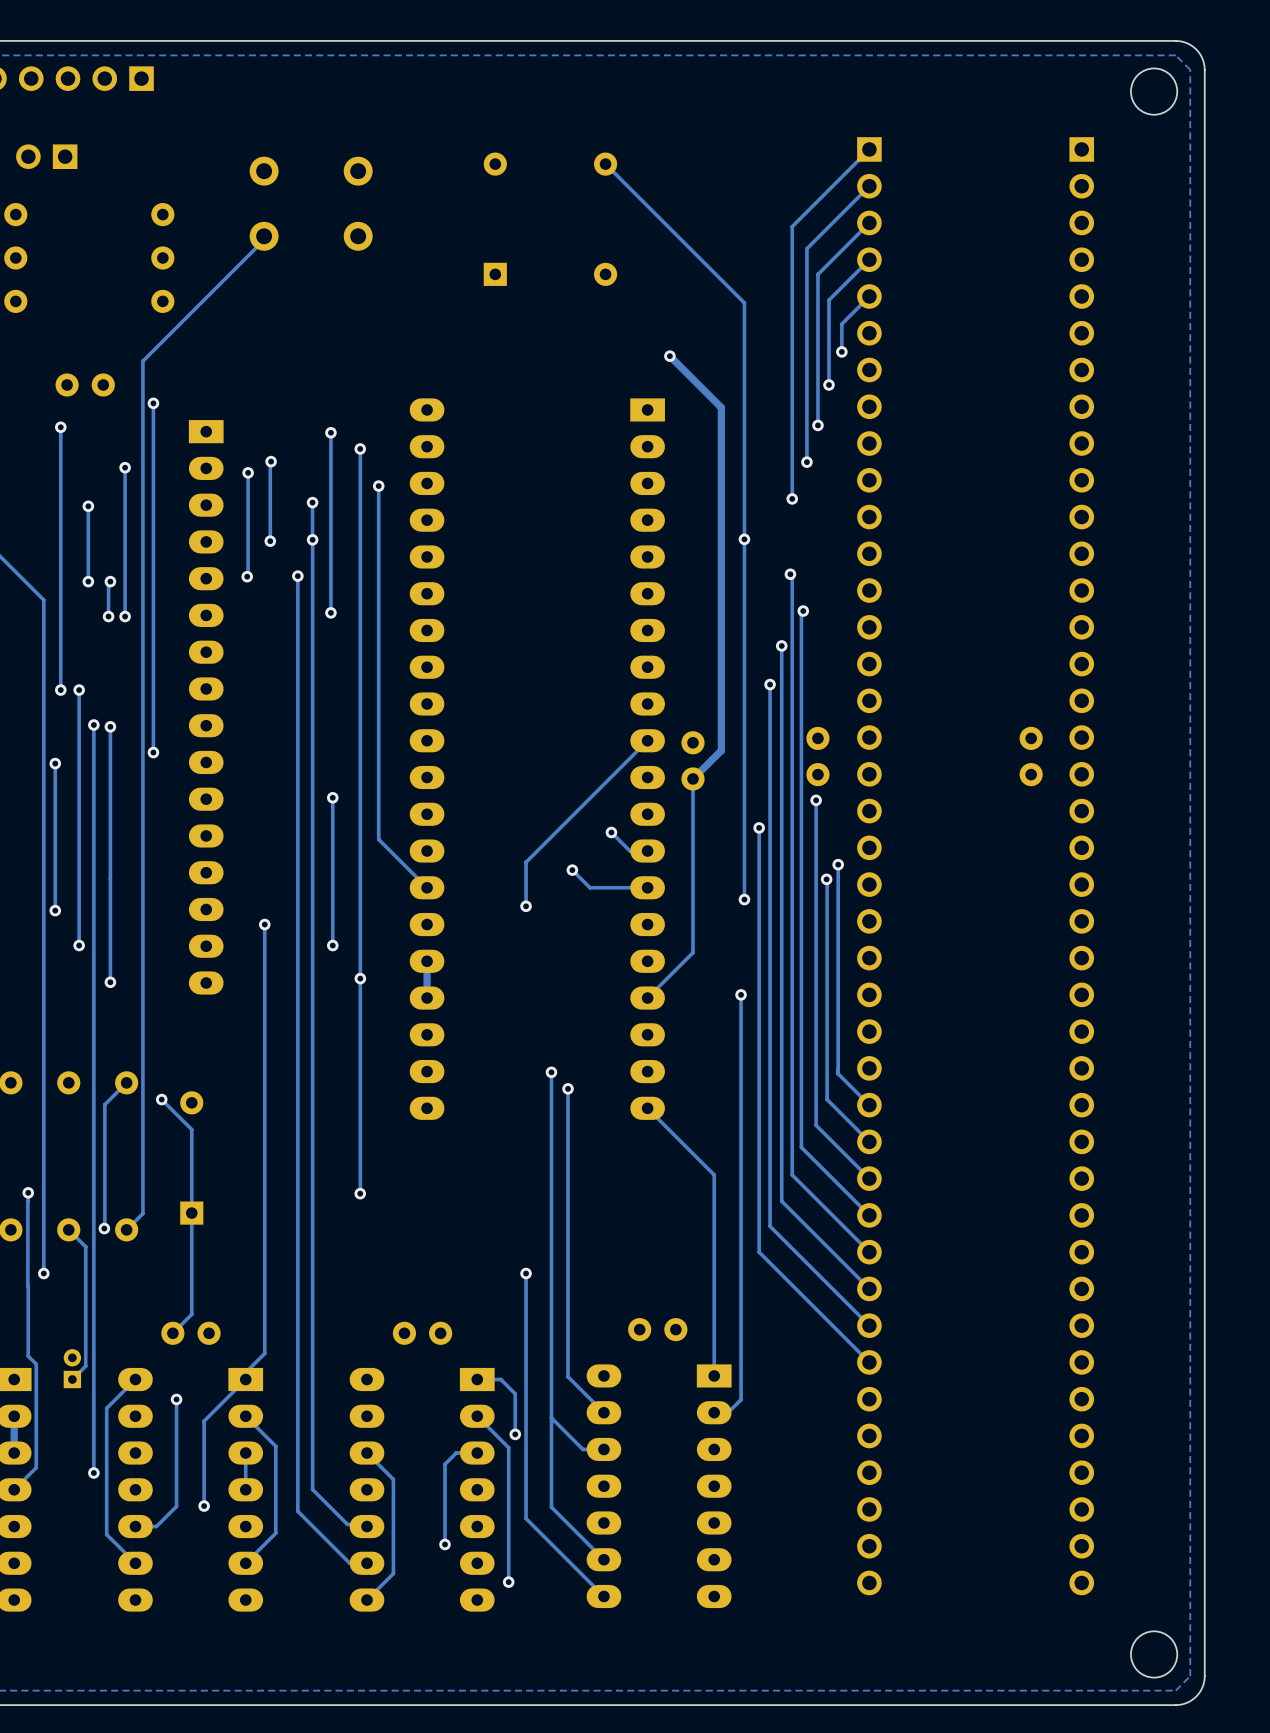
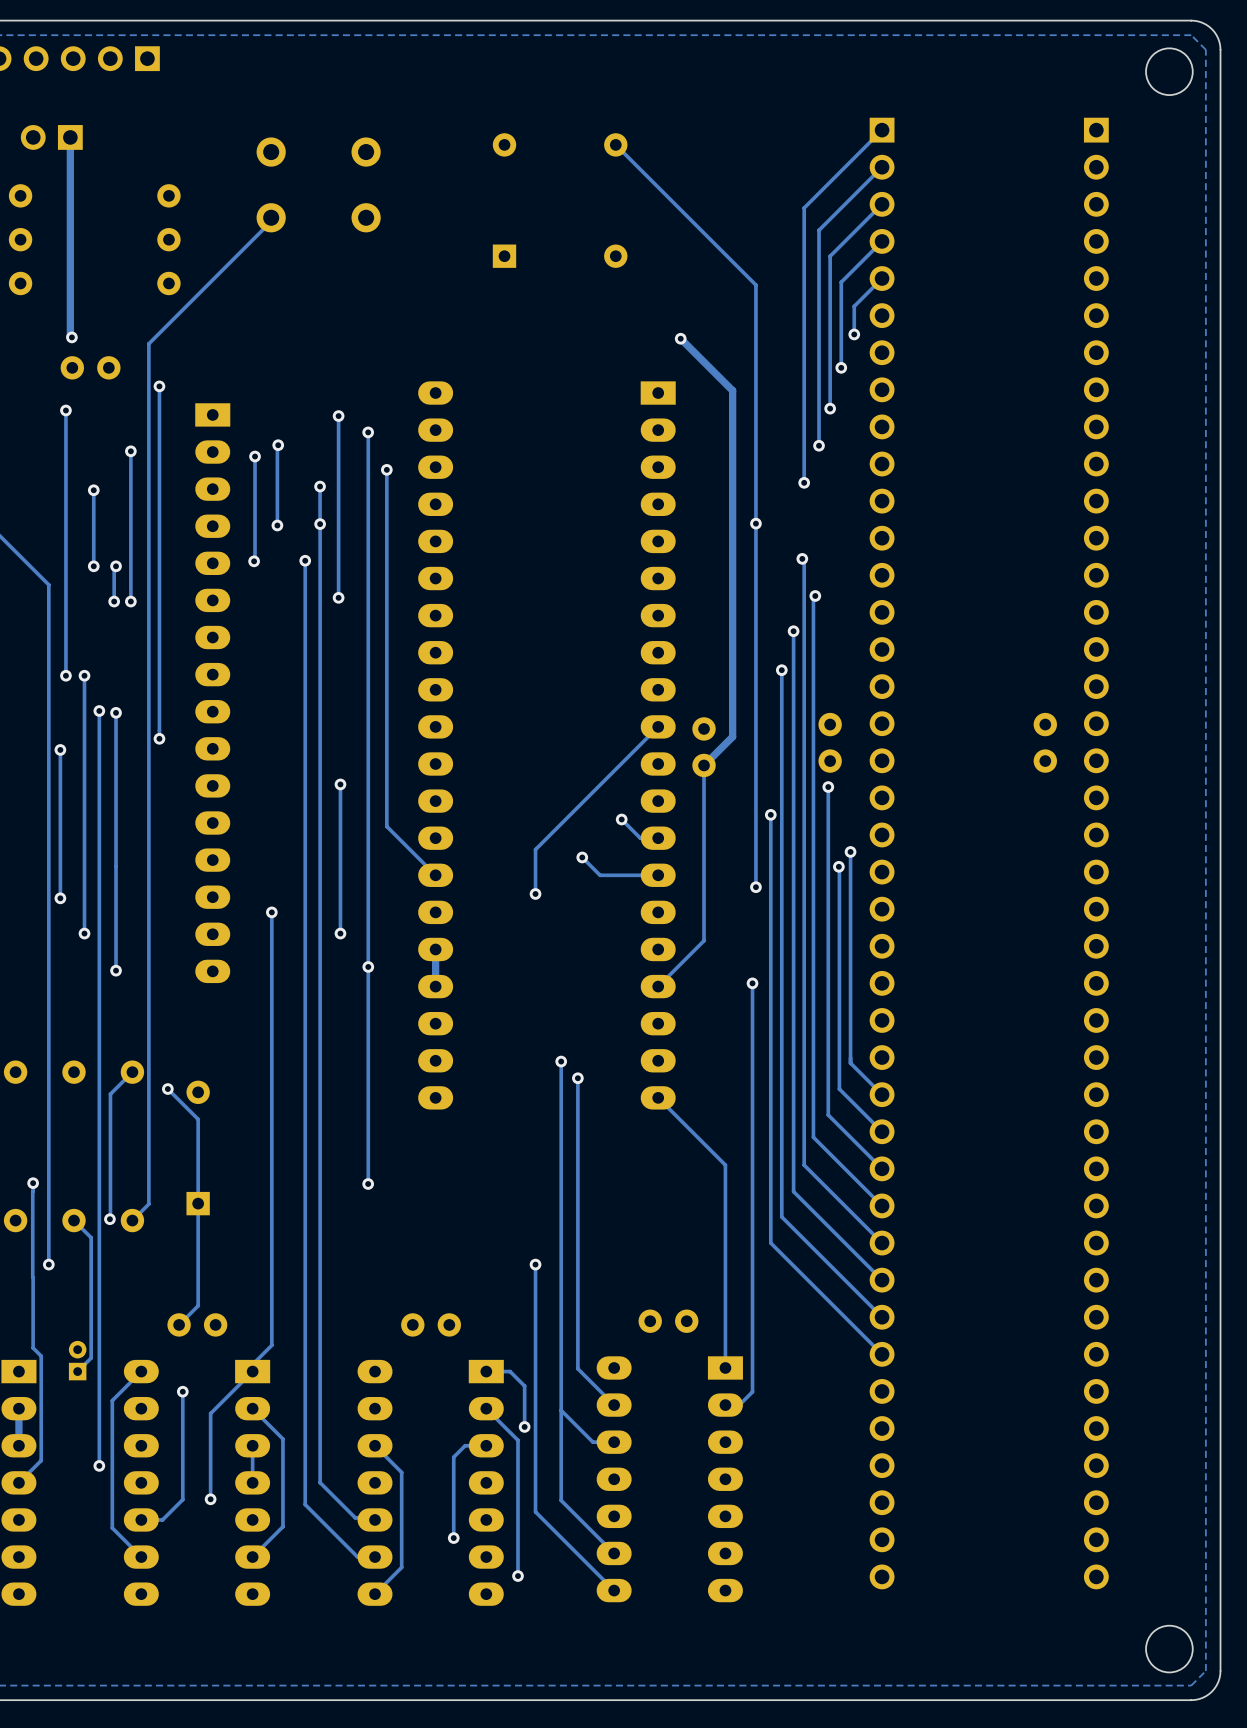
track: none -> (70, 137) (70, 335) (71, 337)
via: none -> (71, 337)

